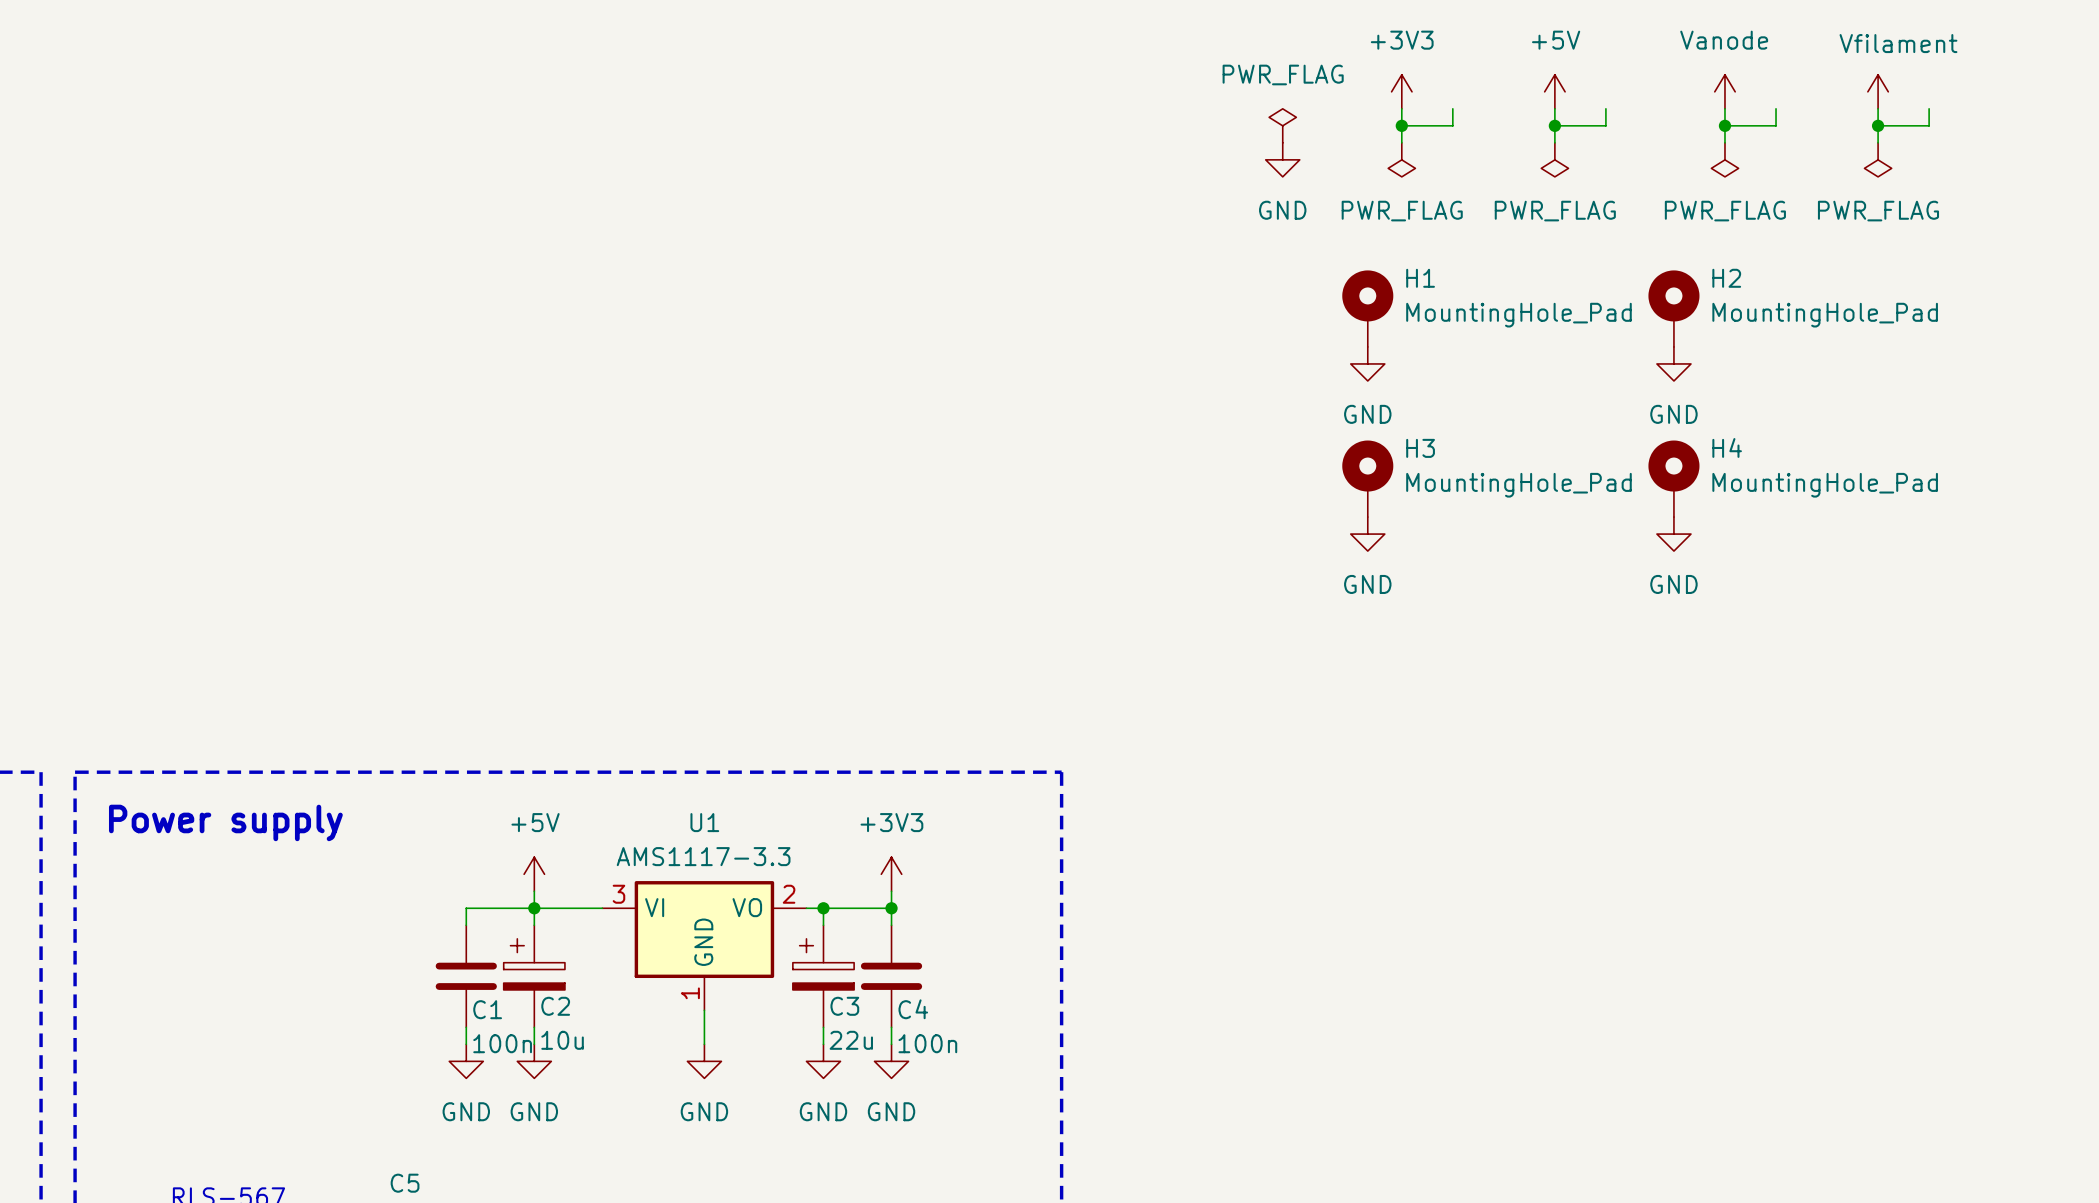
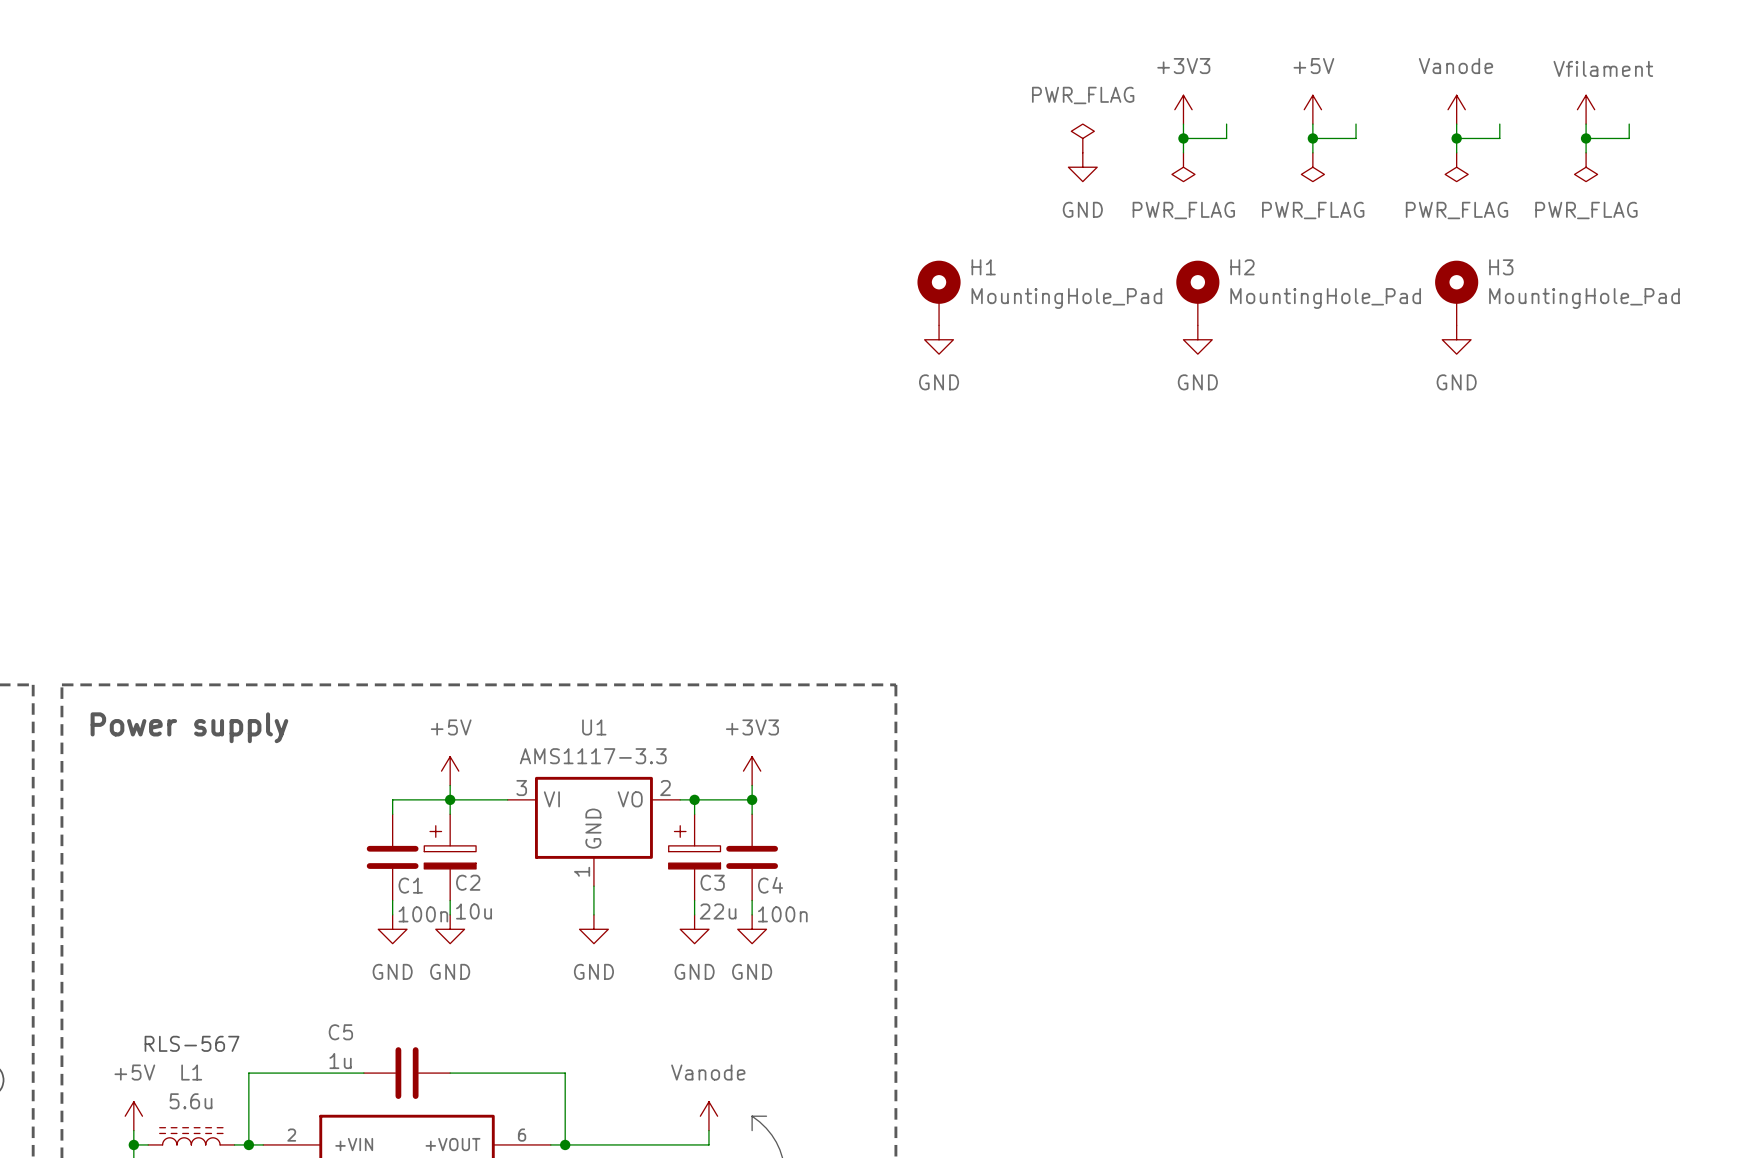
H1 position: (1367, 308) -> (939, 293)
H2 position: (1673, 308) -> (1197, 293)
power symbol: none -> GND (939, 339)
power symbol position: GND (1367, 363) -> GND (1197, 339)
power symbol position: GND (1673, 363) -> GND (1456, 339)
H3 position: (1367, 478) -> (1456, 293)
H4: MountingHole_Pad (1673, 478) -> none
power symbol: GND (1367, 534) -> none
power symbol: GND (1673, 534) -> none

